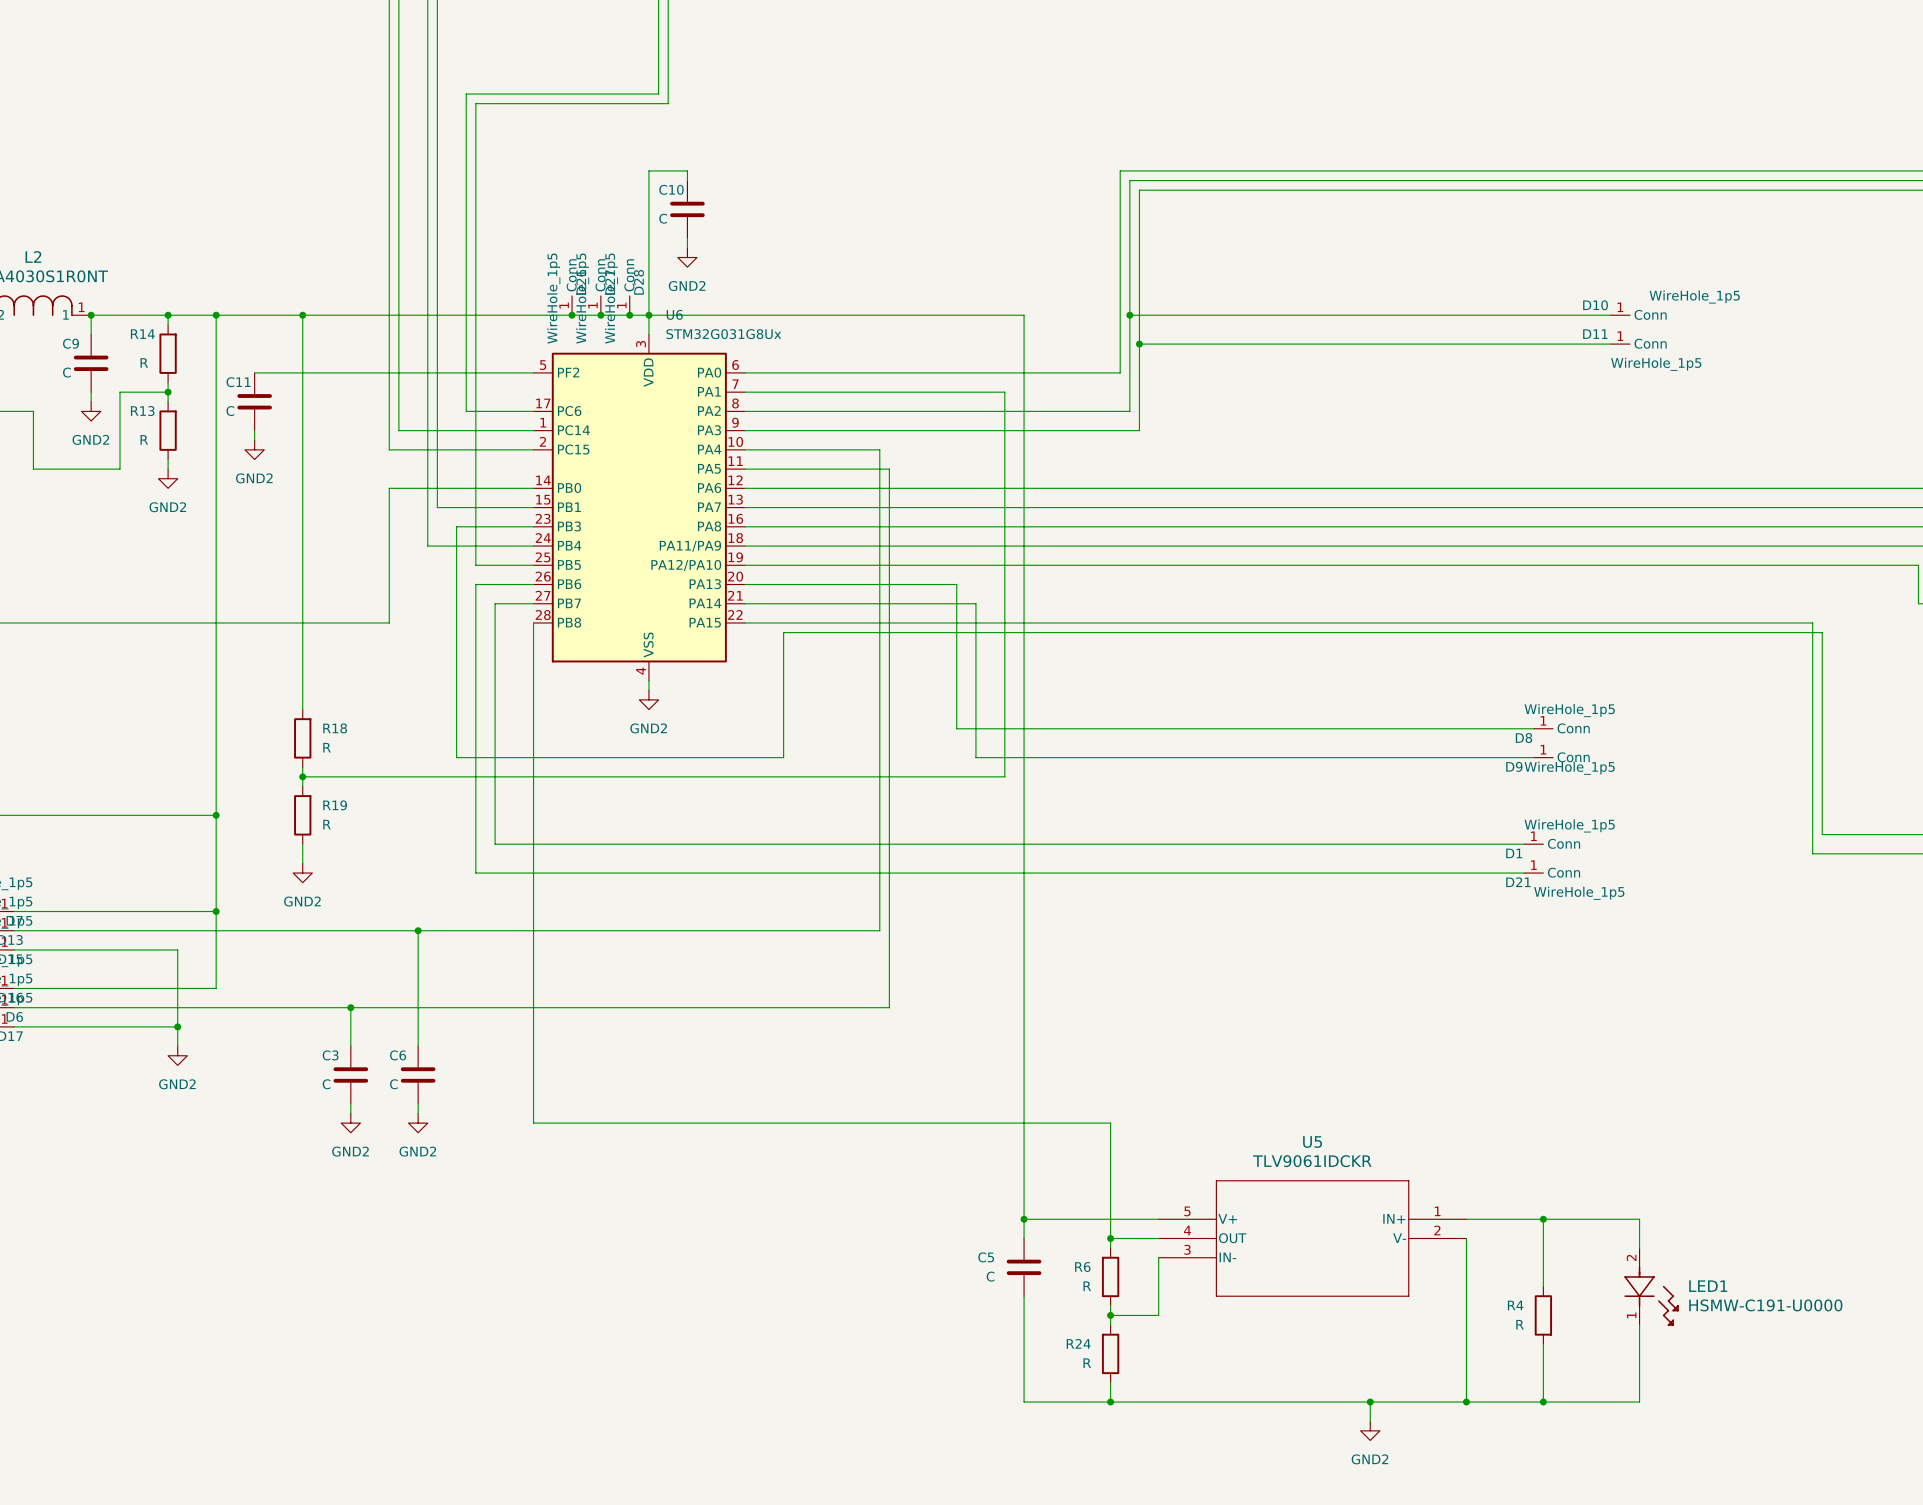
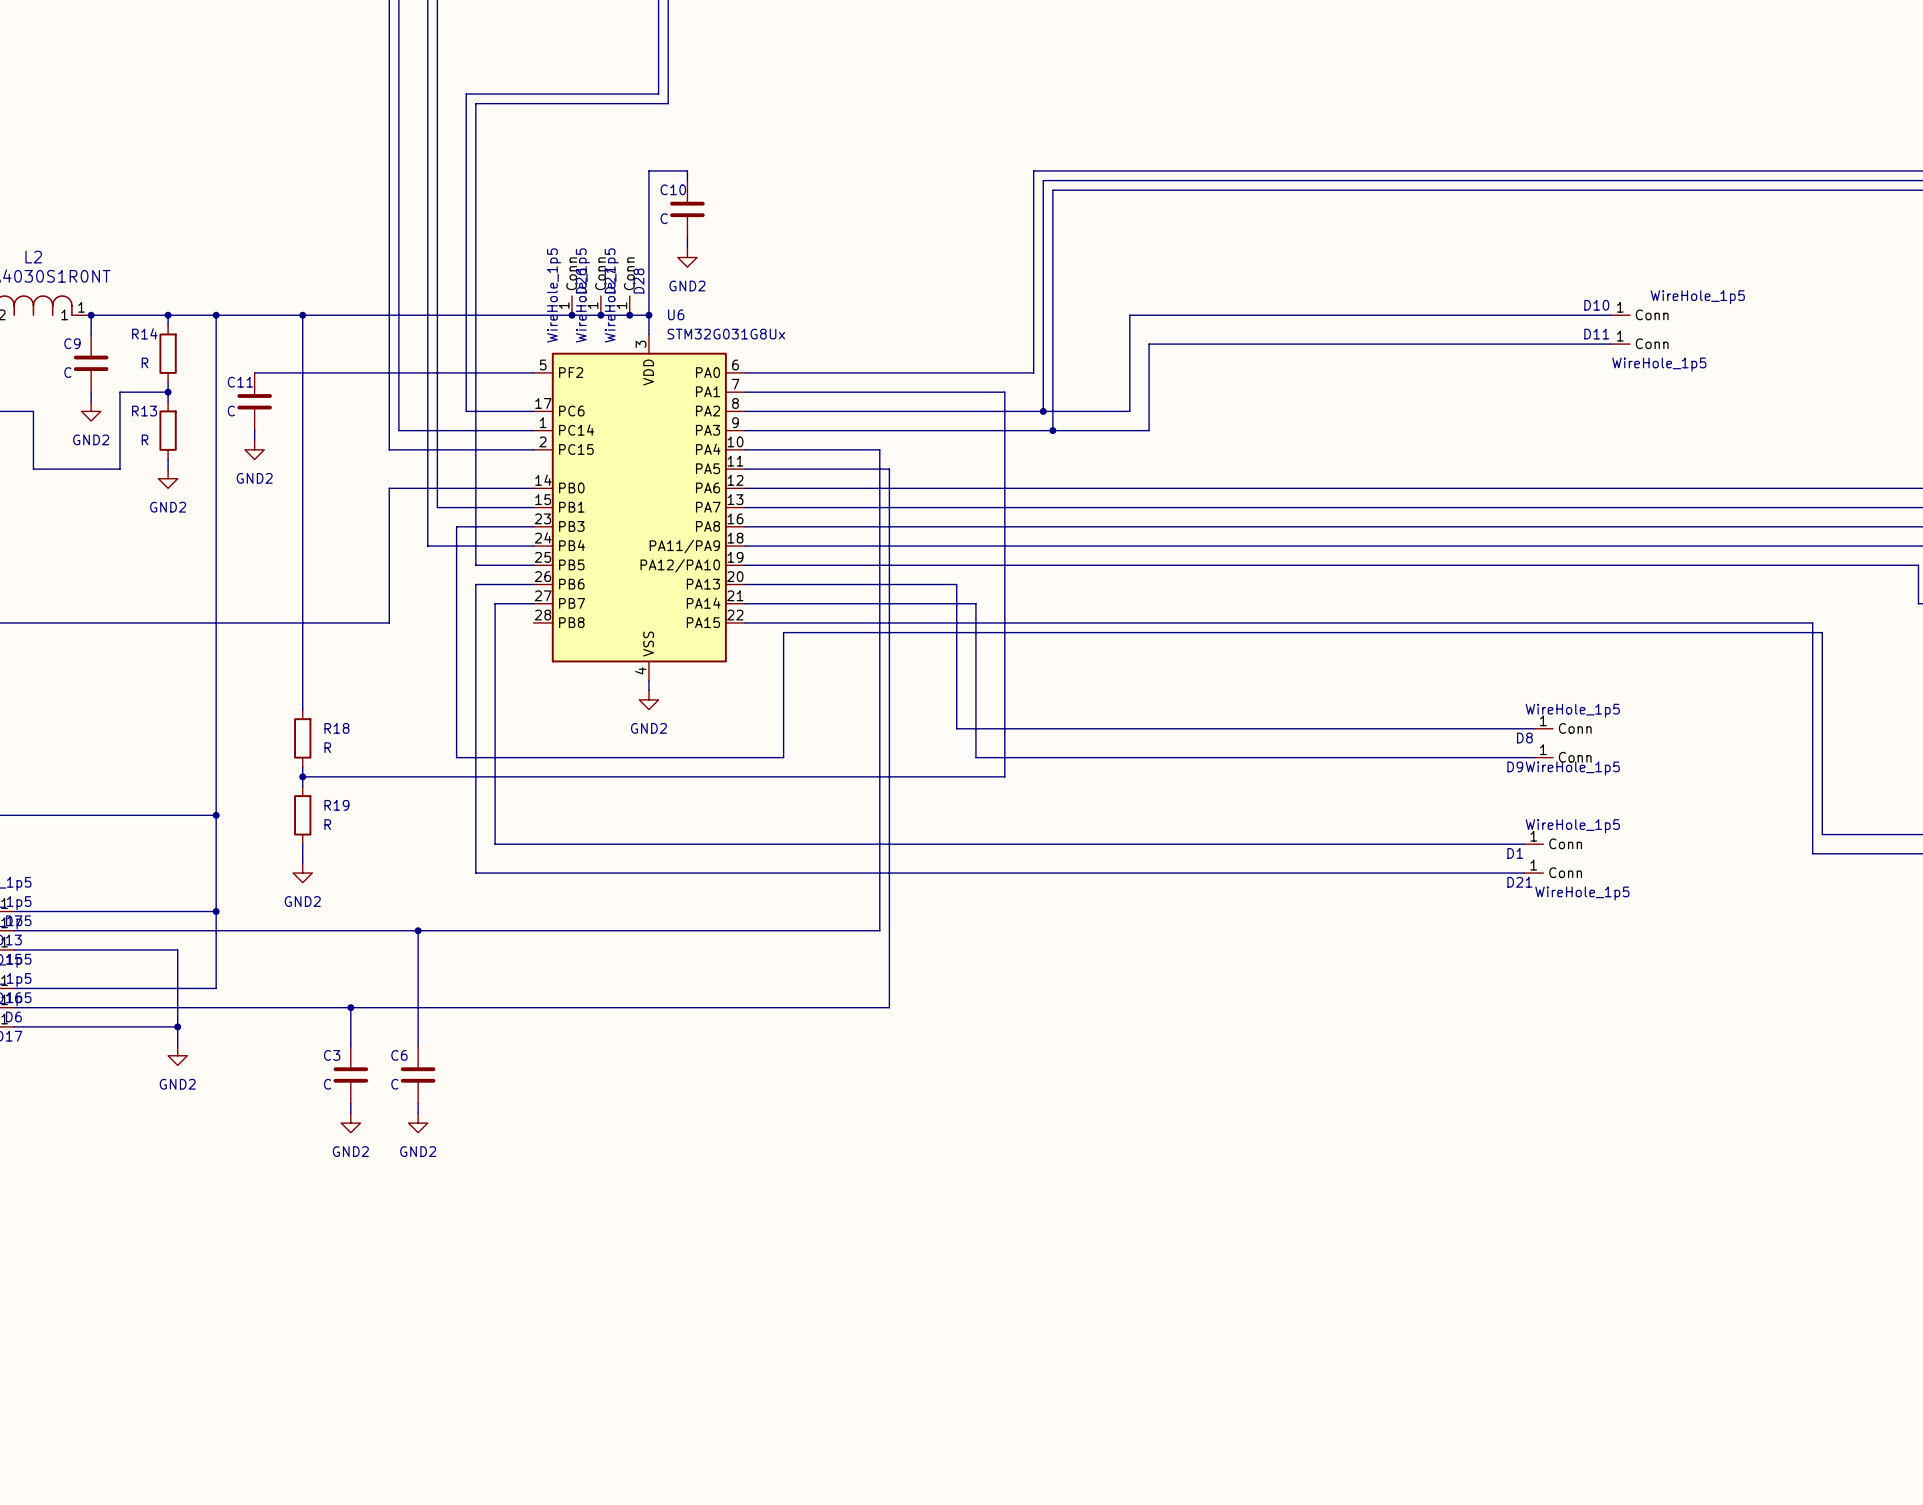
wire: (1120, 170) (1120, 372) (1033, 372) -> (1120, 170) (1033, 170) (1033, 372)
wire: (1129, 180) (1129, 315) -> (1129, 180) (1043, 180) (1043, 411)
wire: (1139, 190) (1139, 430) -> (1139, 190) (1052, 190) (1052, 430)
wire: (648, 315) (1024, 315) (1024, 1238) -> none
junction: (1129, 315) -> none
wire: (1139, 344) (1149, 344) -> (1139, 430) (1149, 430) (1149, 344)
junction: (1139, 344) -> none
junction: none -> (1043, 411)
junction: none -> (1052, 430)
wire: (533, 622) (533, 1123) (1110, 1123) (1110, 1248) -> none
wire: (1024, 1219) (1158, 1219) -> none
junction: (1024, 1219) -> none
wire: (1466, 1219) (1639, 1219) (1639, 1248) -> none
wire: (1543, 1219) (1543, 1286) -> none
junction: (1543, 1219) -> none
wire: (1110, 1238) (1158, 1238) -> none
junction: (1110, 1238) -> none
U5: TLV9061IDCKR (1312, 1238) -> none
wire: (1466, 1238) (1466, 1402) -> none
wire: (1158, 1257) (1158, 1315) (1110, 1315) -> none
C5: C (1024, 1267) -> none
R6: R (1110, 1276) -> none
LED1: HSMW-C191-U0000 (1651, 1286) -> none
wire: (1024, 1296) (1024, 1402) (1639, 1402) (1639, 1325) -> none
wire: (1110, 1305) (1110, 1325) -> none
junction: (1110, 1315) -> none
R4: R (1543, 1315) -> none
wire: (1543, 1344) (1543, 1402) -> none
R24: R (1110, 1353) -> none
wire: (1110, 1382) (1110, 1402) -> none
junction: (1110, 1402) -> none
wire: (1370, 1402) (1370, 1421) -> none
junction: (1370, 1402) -> none
junction: (1466, 1402) -> none
junction: (1543, 1402) -> none
power symbol: GND2 (1370, 1430) -> none

